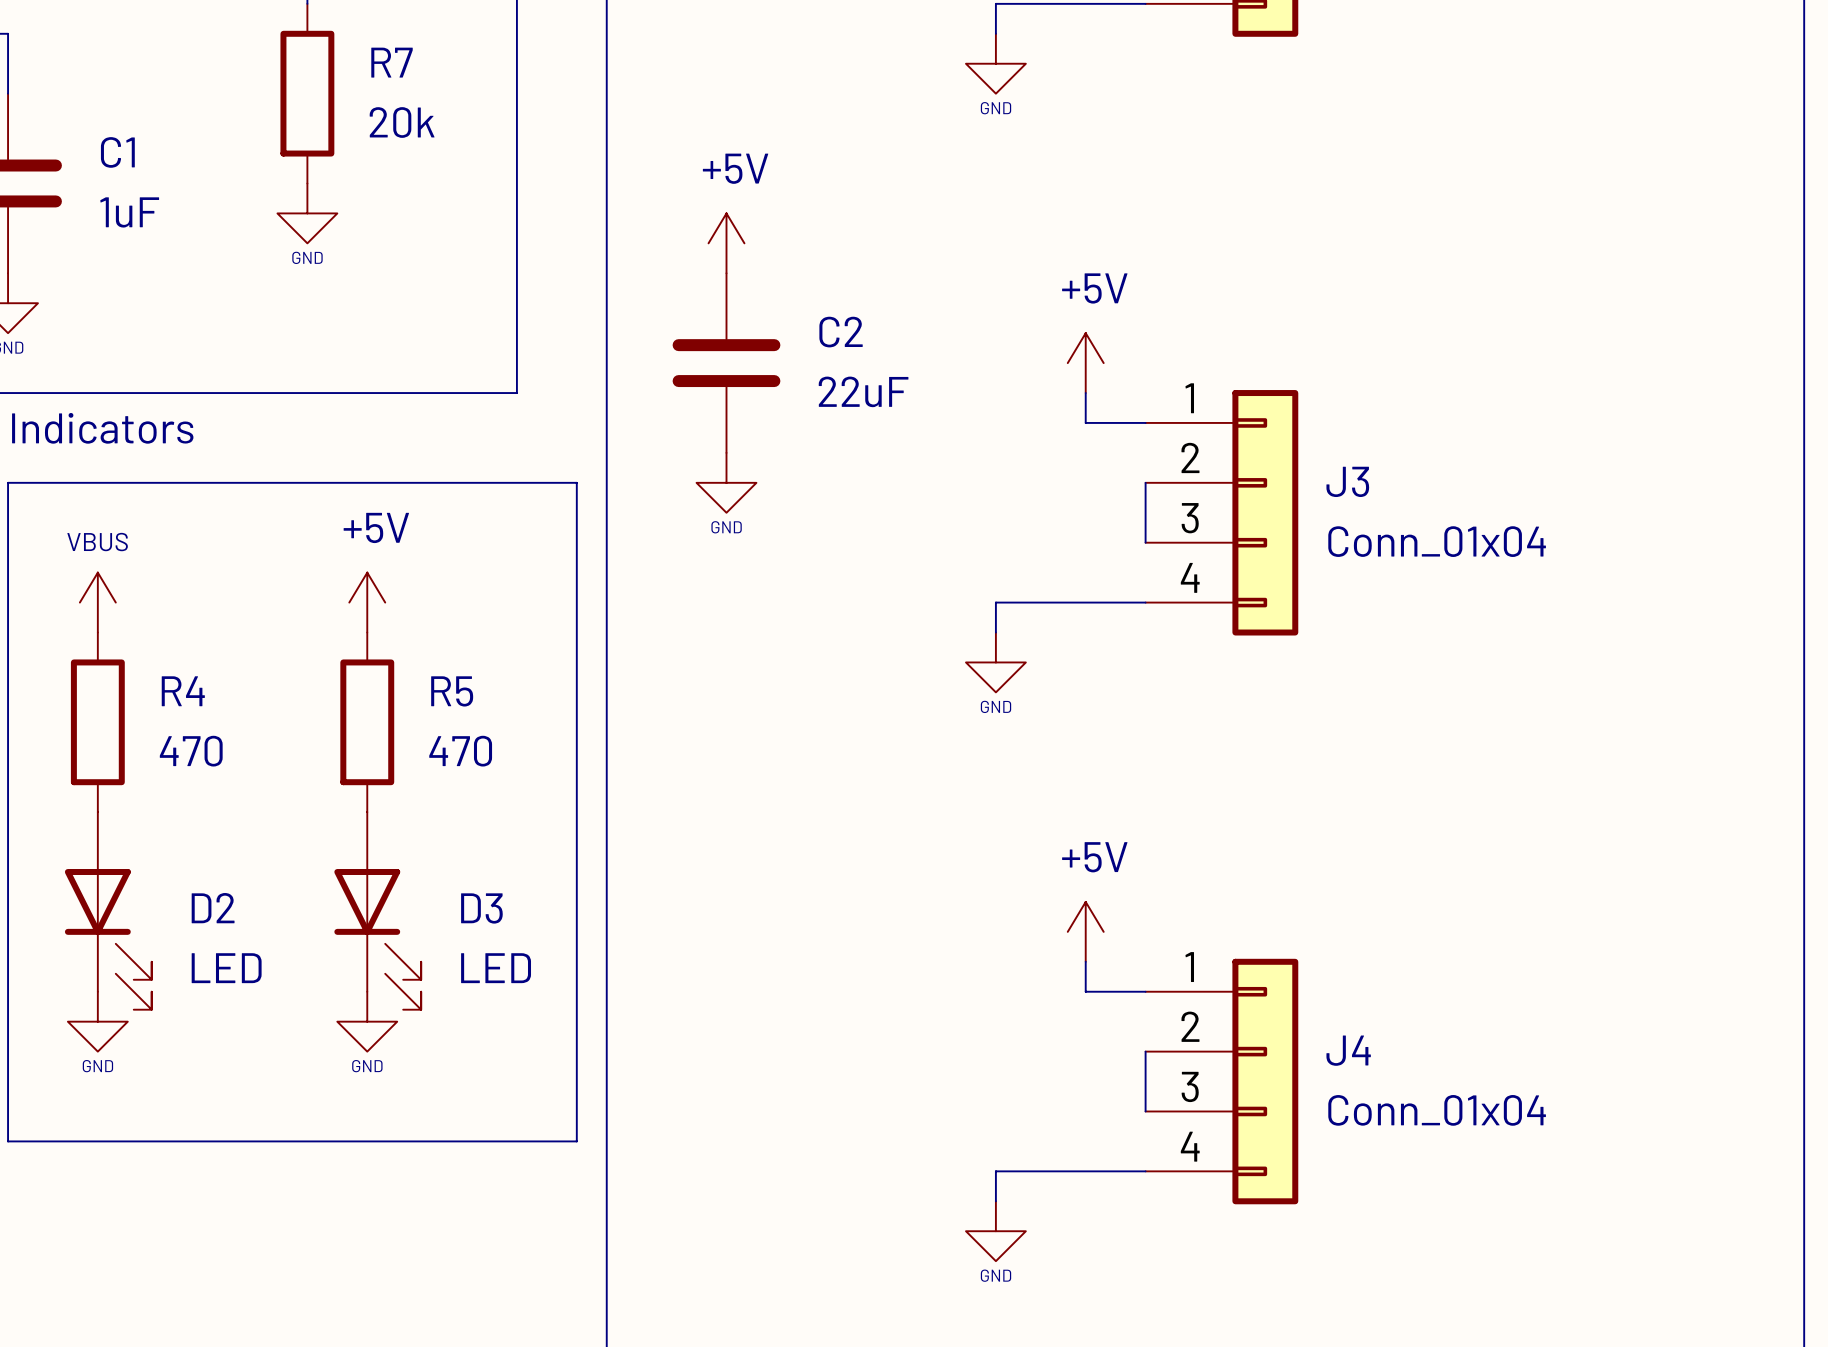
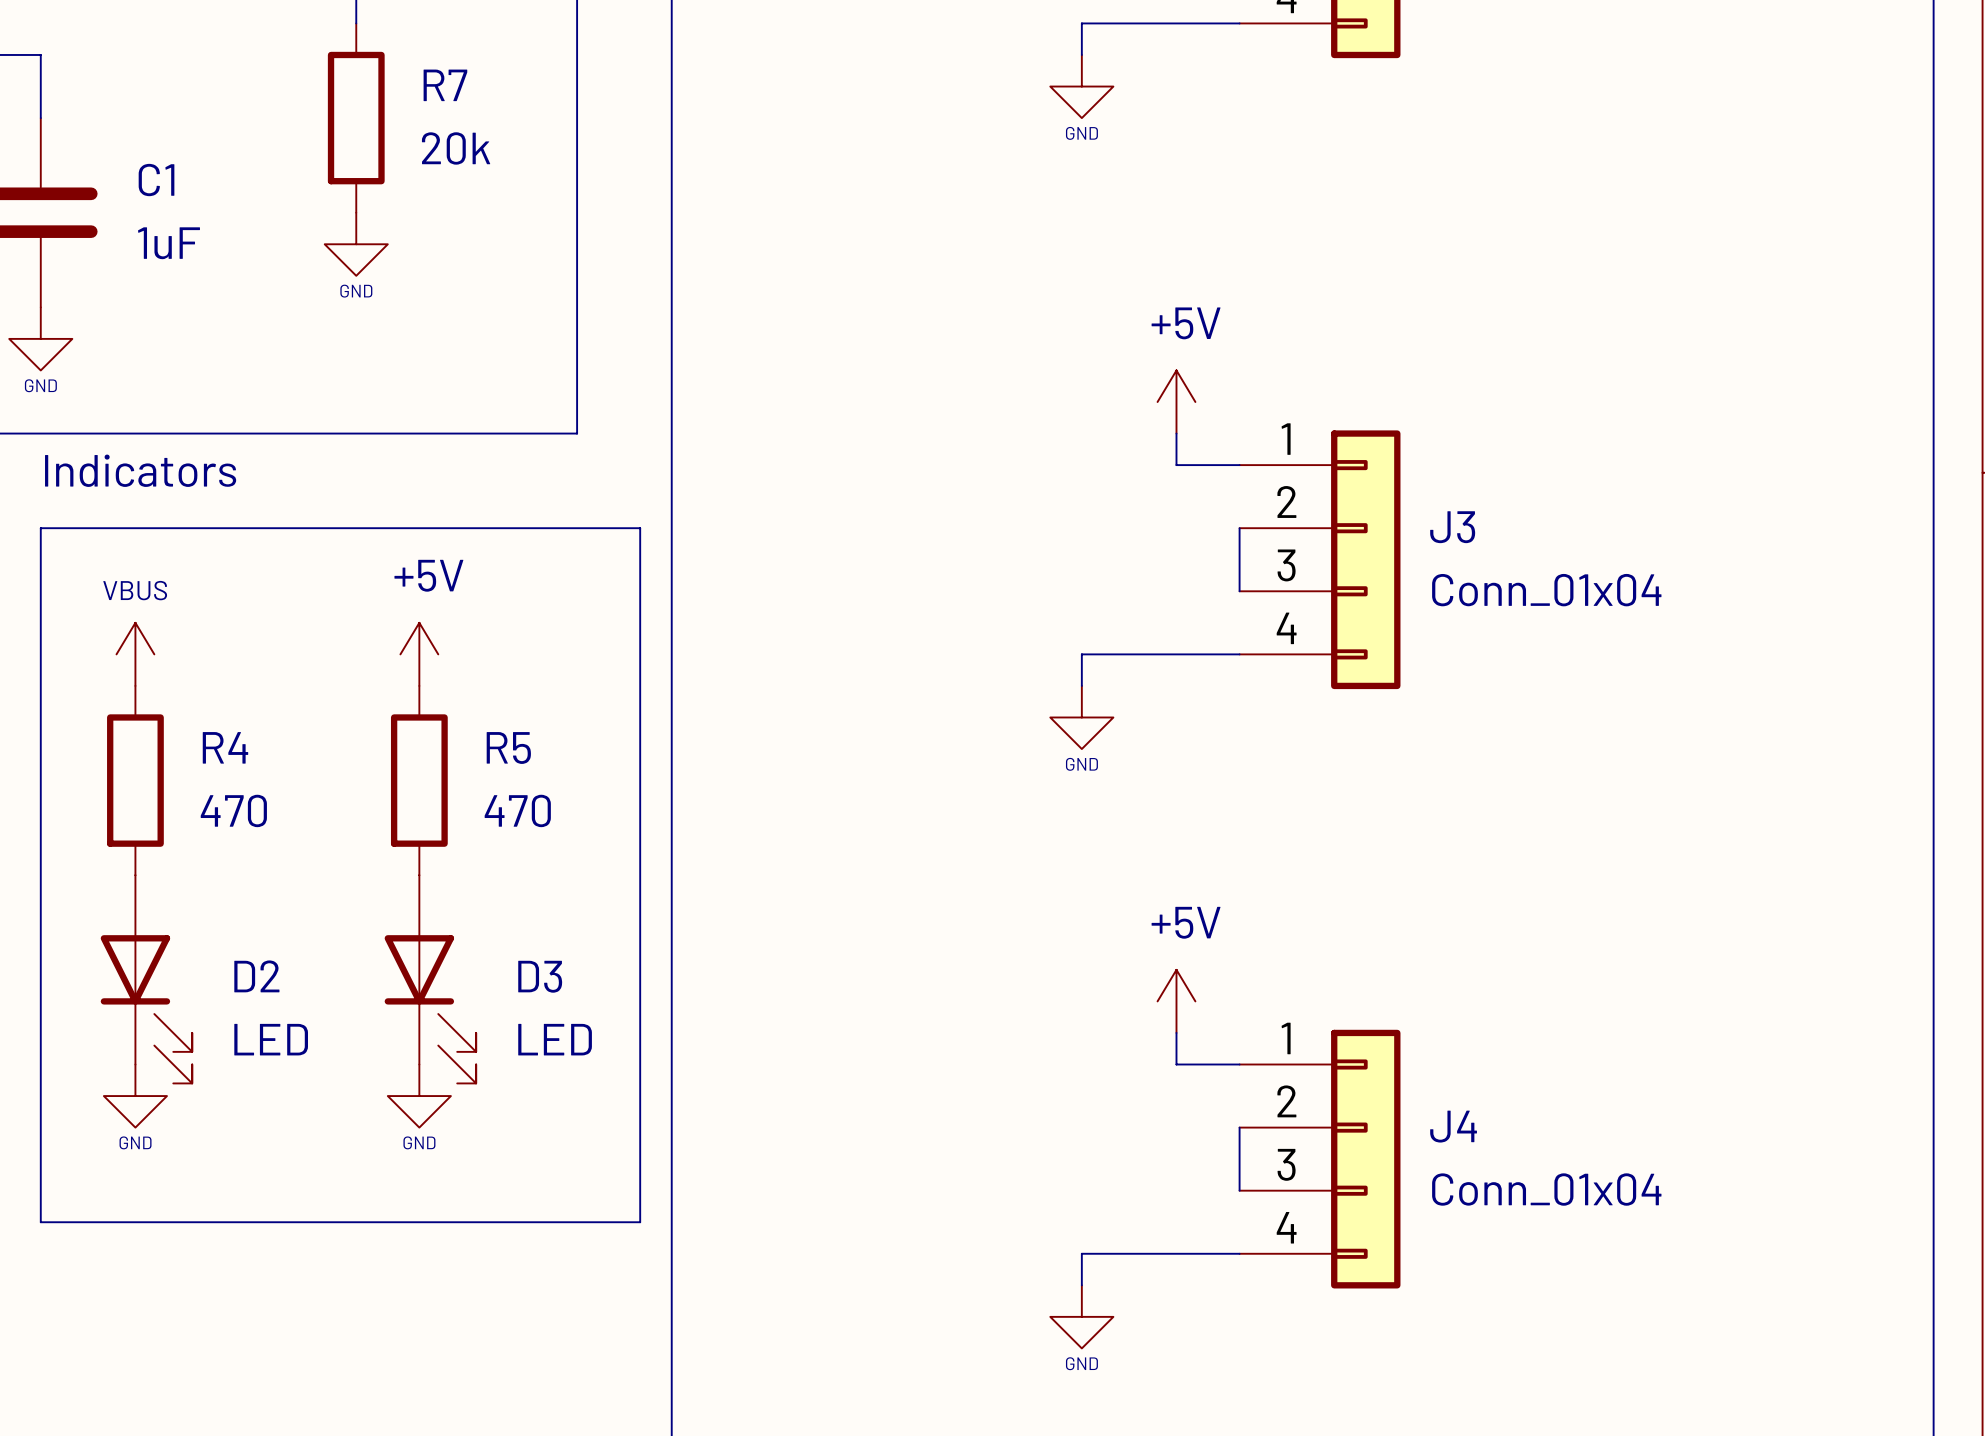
power symbol: +5V (726, 243) -> none
C2: 22uF (726, 363) -> none
power symbol: GND (726, 482) -> none

